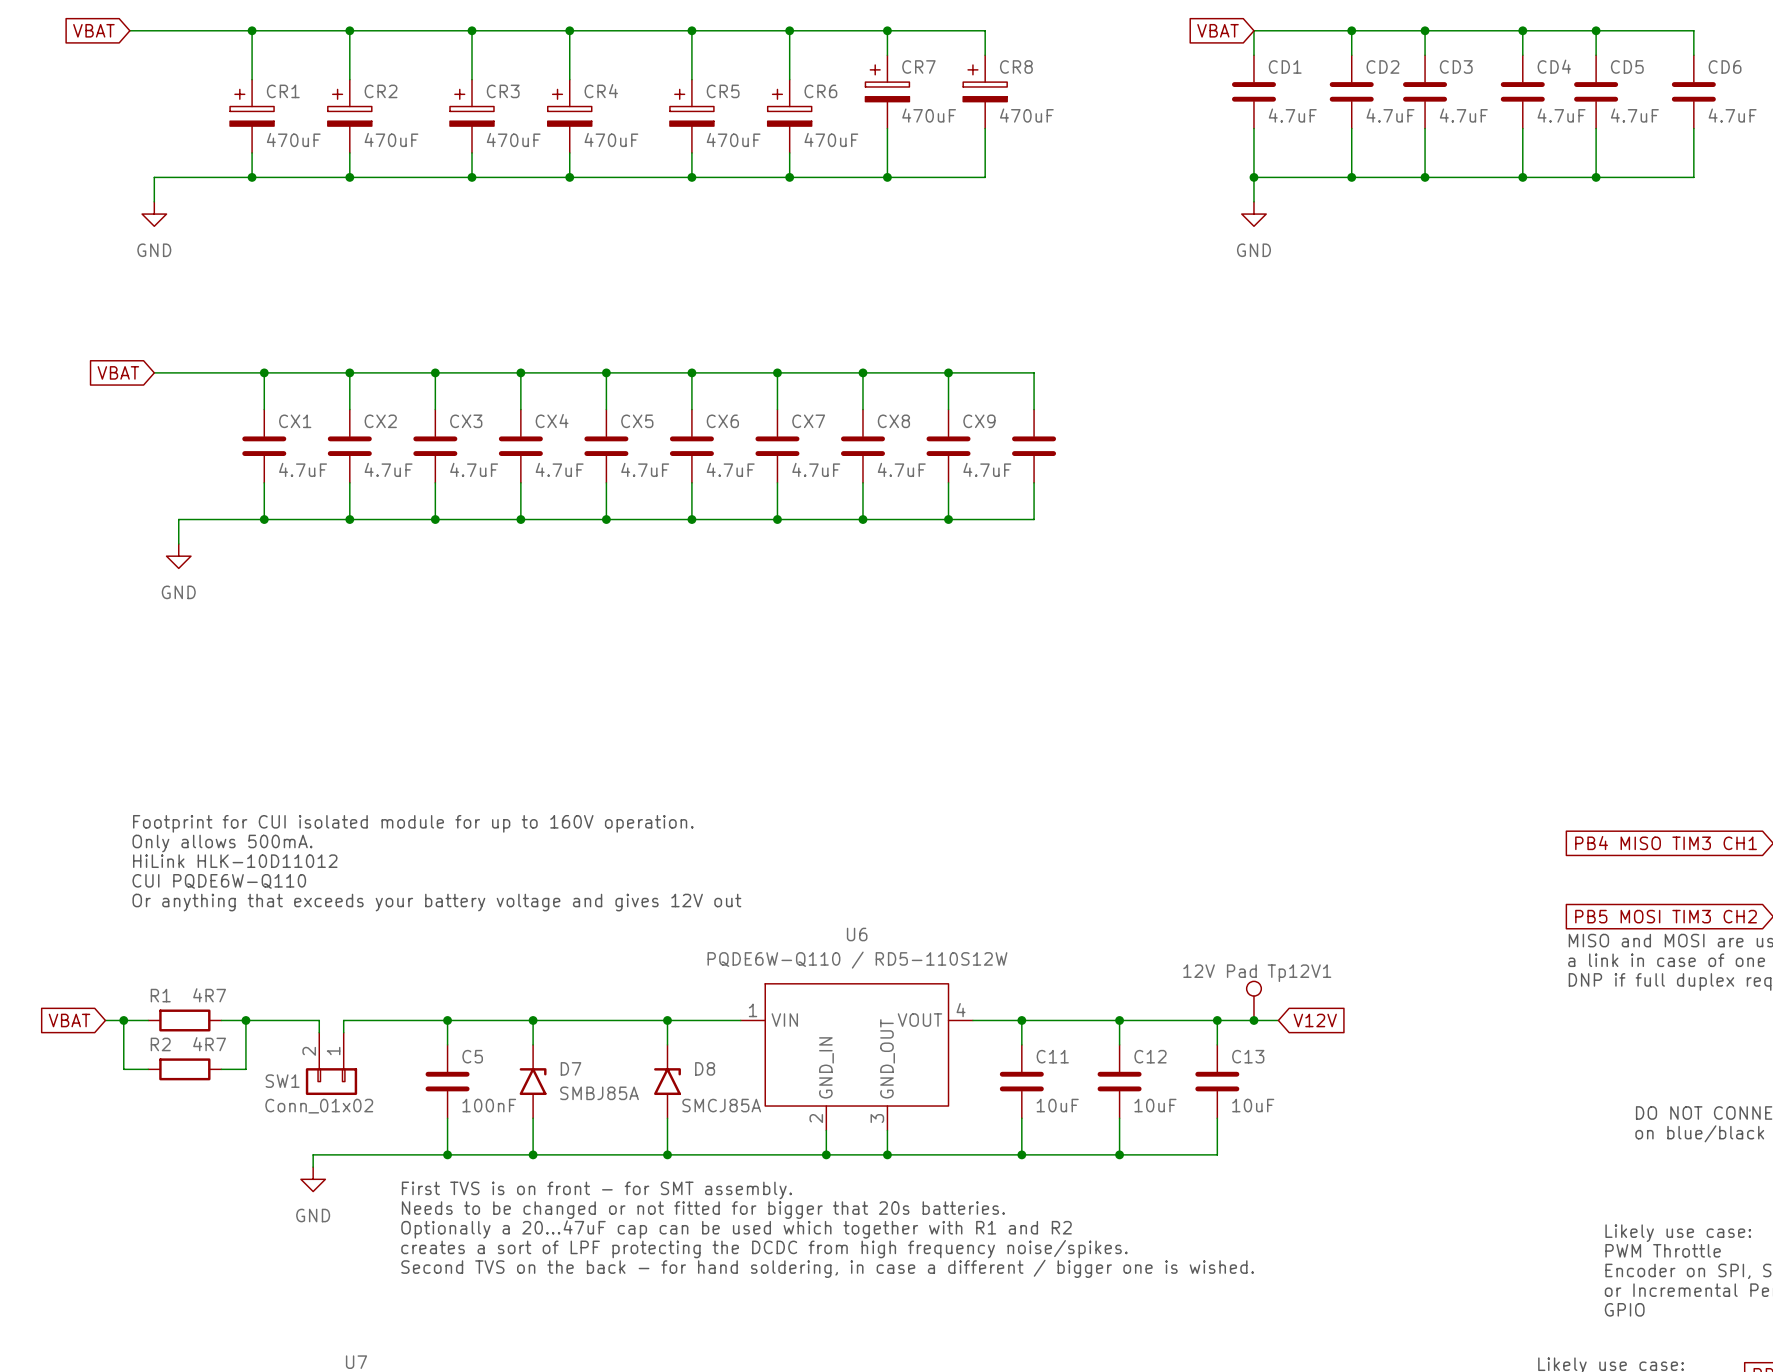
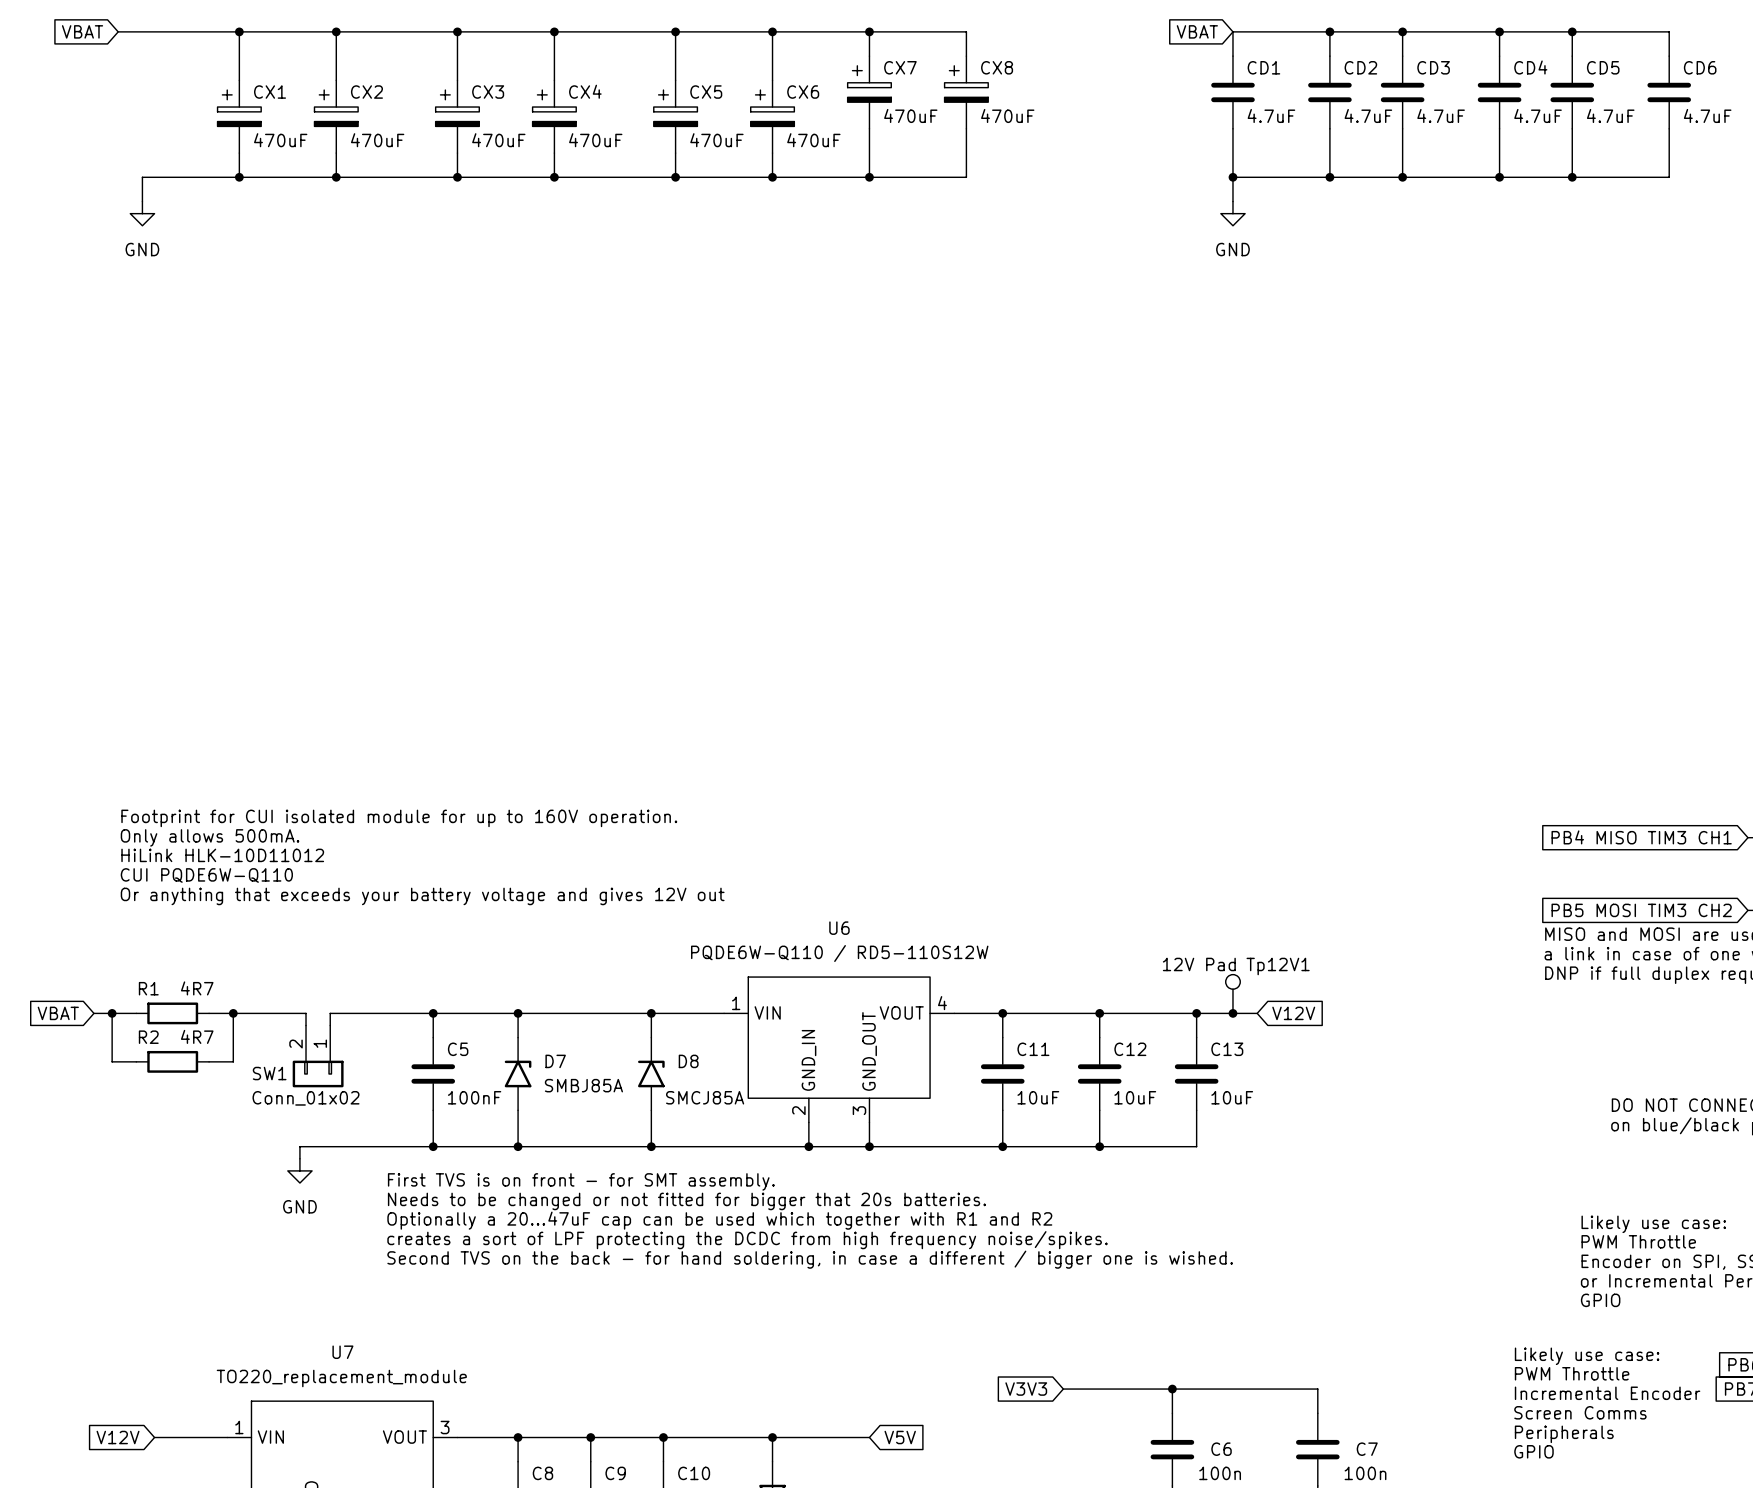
CR7 name: CR7 (918, 66) -> CX7 (900, 67)
CR8 name: CR8 (1016, 66) -> CX8 (997, 67)
CR1 name: CR1 (283, 91) -> CX1 (270, 92)
CR2 name: CR2 (381, 91) -> CX2 (366, 92)
CR3 name: CR3 (503, 91) -> CX3 (488, 92)
CR4 name: CR4 (601, 91) -> CX4 (585, 91)
CR5 name: CR5 (723, 91) -> CX5 (706, 92)
CR6 name: CR6 (820, 91) -> CX6 (803, 92)
global label: VBAT (118, 372) -> none
wire: (154, 372) (1034, 372) (1034, 409) -> none
wire: (264, 372) (264, 409) -> none
junction: (264, 372) -> none
wire: (349, 372) (349, 409) -> none
junction: (349, 372) -> none
wire: (435, 372) (435, 409) -> none
junction: (435, 372) -> none
wire: (520, 372) (520, 409) -> none
junction: (520, 372) -> none
wire: (606, 372) (606, 409) -> none
junction: (606, 372) -> none
wire: (691, 372) (691, 409) -> none
junction: (691, 372) -> none
wire: (777, 372) (777, 409) -> none
junction: (777, 372) -> none
wire: (862, 372) (862, 409) -> none
junction: (862, 372) -> none
wire: (948, 372) (948, 409) -> none
junction: (948, 372) -> none
CX1: 4.7uF (264, 446) -> none
CX2: 4.7uF (349, 446) -> none
CX3: 4.7uF (435, 446) -> none
CX4: 4.7uF (520, 446) -> none
CX5: 4.7uF (606, 446) -> none
CX6: 4.7uF (691, 446) -> none
CX7: 4.7uF (777, 446) -> none
CX8: 4.7uF (862, 446) -> none
CX9: 4.7uF (948, 446) -> none
part: (1034, 446) -> none
wire: (264, 482) (264, 519) -> none
wire: (349, 482) (349, 519) -> none
wire: (435, 482) (435, 519) -> none
wire: (520, 482) (520, 519) -> none
wire: (606, 482) (606, 519) -> none
wire: (691, 482) (691, 519) -> none
wire: (777, 482) (777, 519) -> none
wire: (862, 482) (862, 519) -> none
wire: (948, 482) (948, 519) -> none
wire: (1034, 482) (1034, 519) (178, 519) (178, 543) -> none
junction: (264, 519) -> none
junction: (349, 519) -> none
junction: (435, 519) -> none
junction: (520, 519) -> none
junction: (606, 519) -> none
junction: (691, 519) -> none
junction: (777, 519) -> none
junction: (862, 519) -> none
junction: (948, 519) -> none
power symbol: GND (178, 556) -> none

